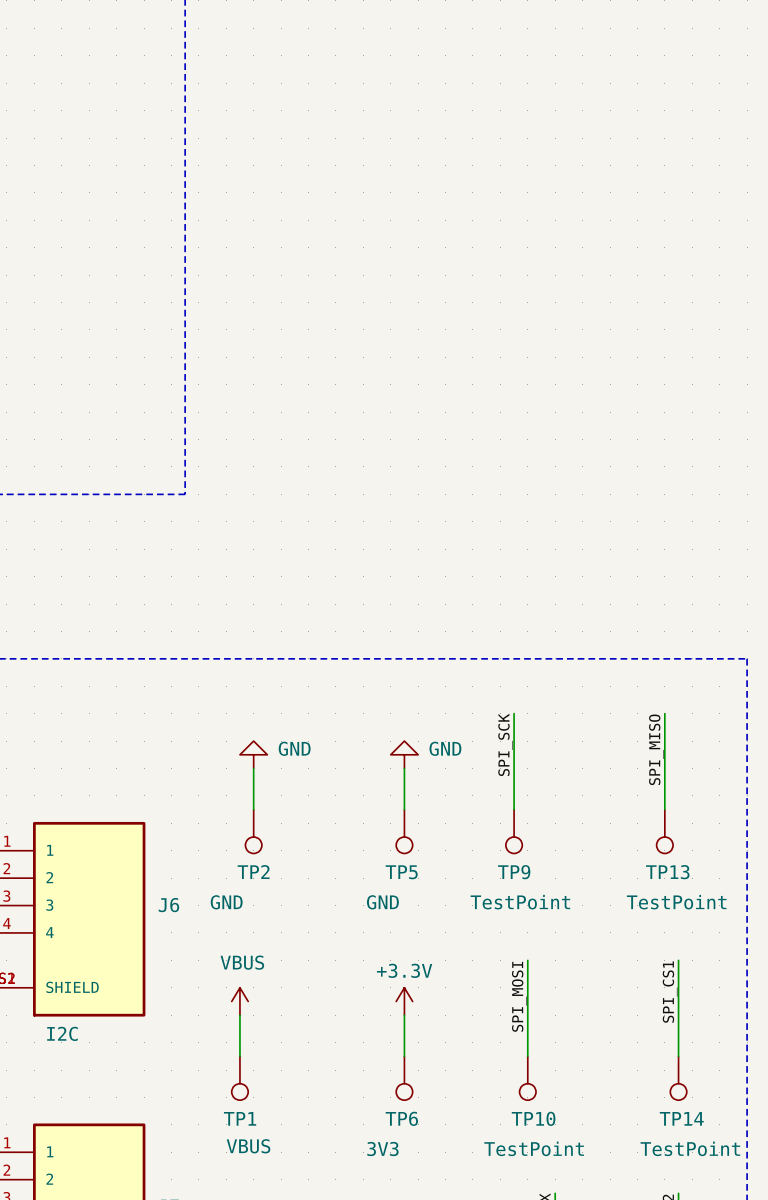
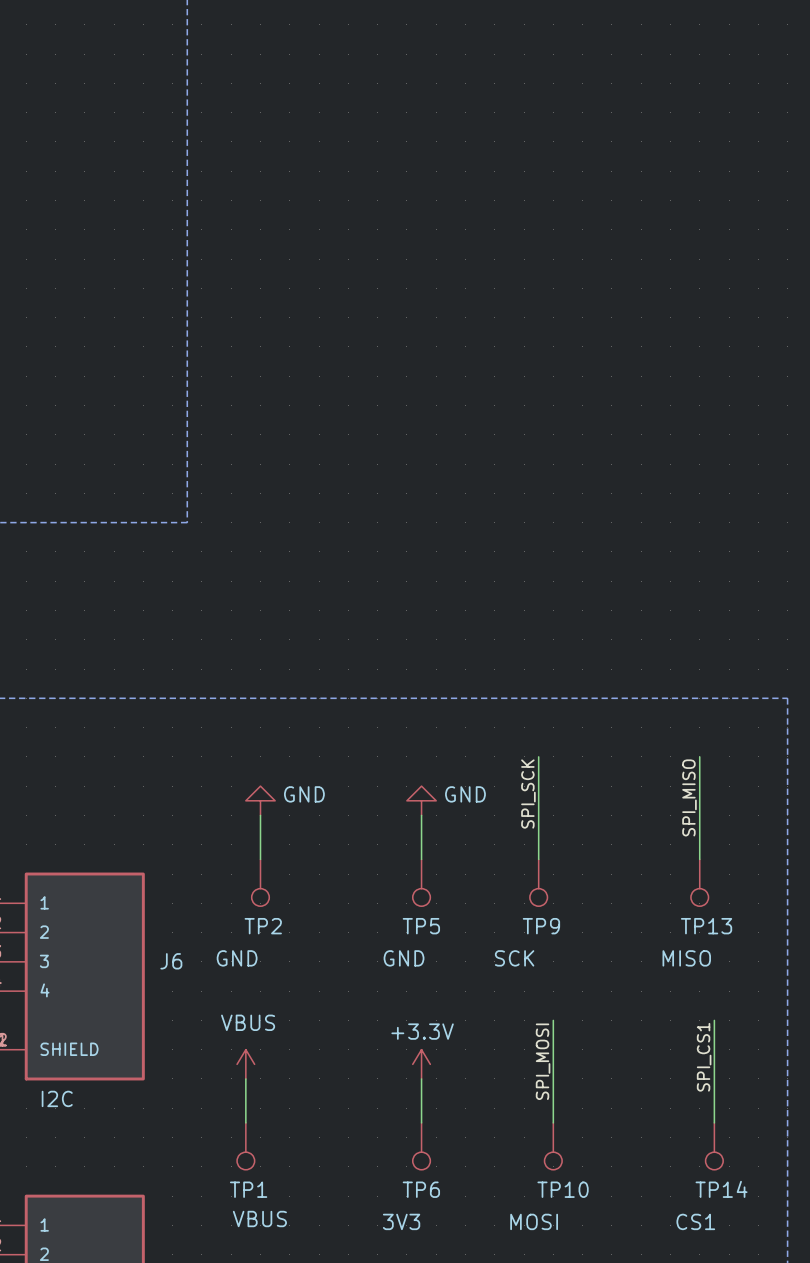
TP9 value: TestPoint (520, 902) -> SCK (514, 958)
TP13 value: TestPoint (676, 902) -> MISO (686, 958)
TP10 value: TestPoint (534, 1148) -> MOSI (534, 1221)
TP14 value: TestPoint (690, 1148) -> CS1 (695, 1221)

